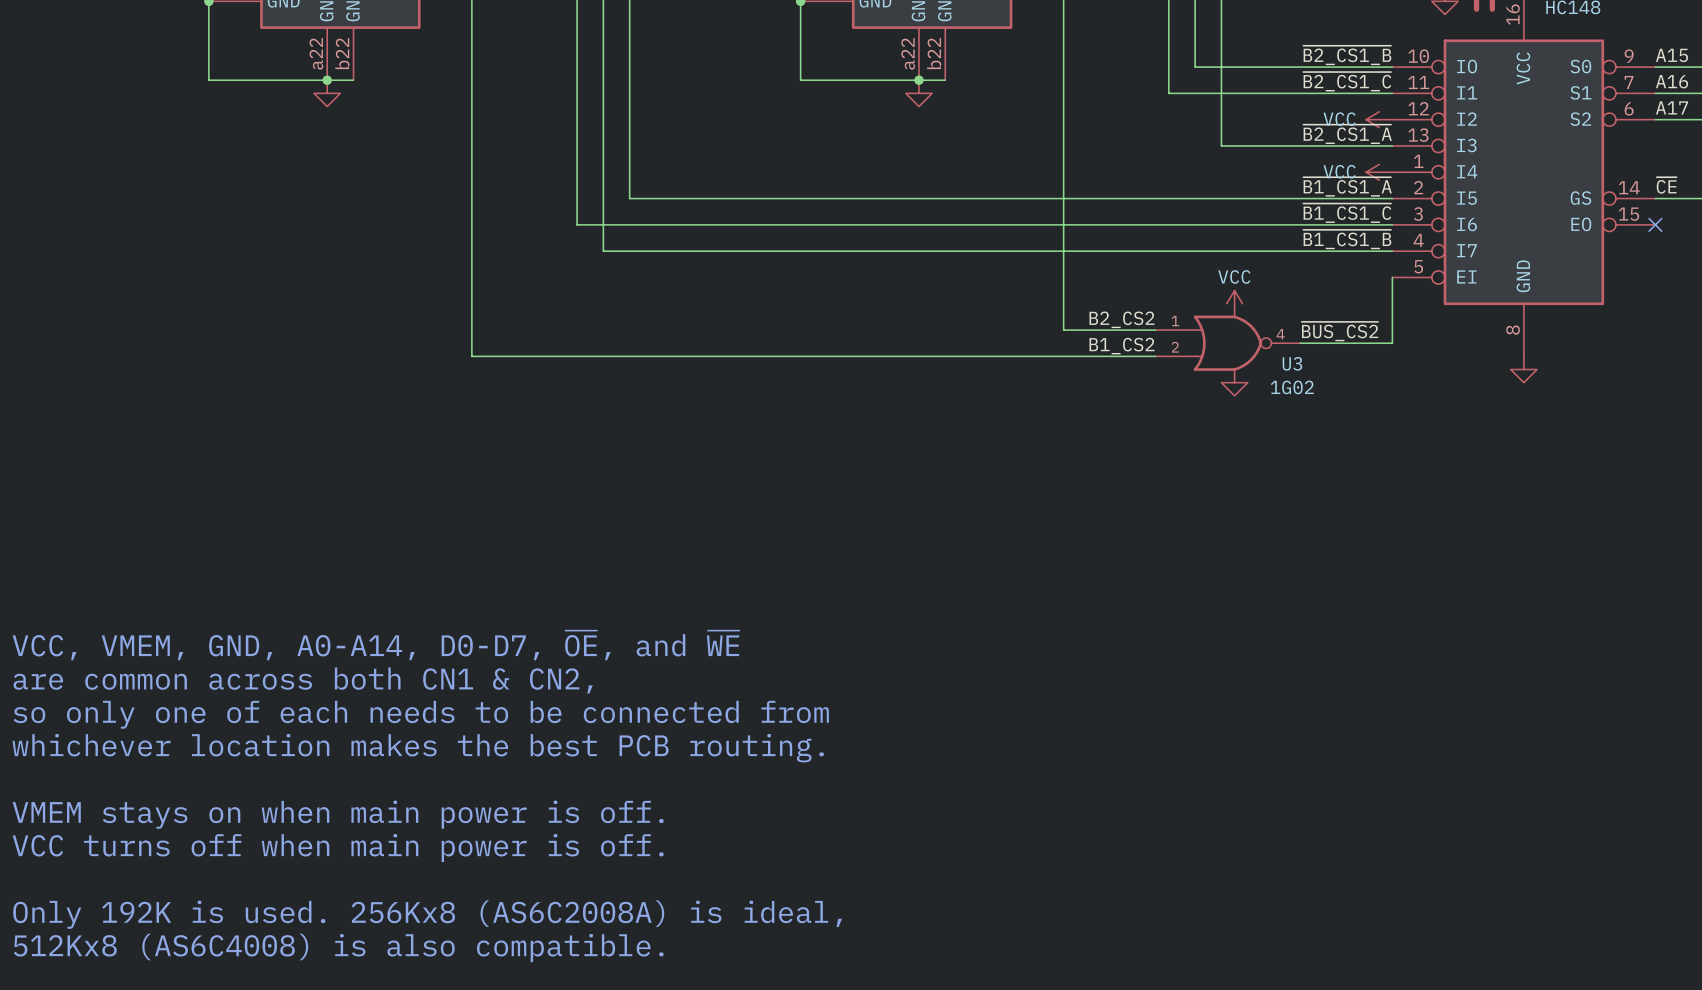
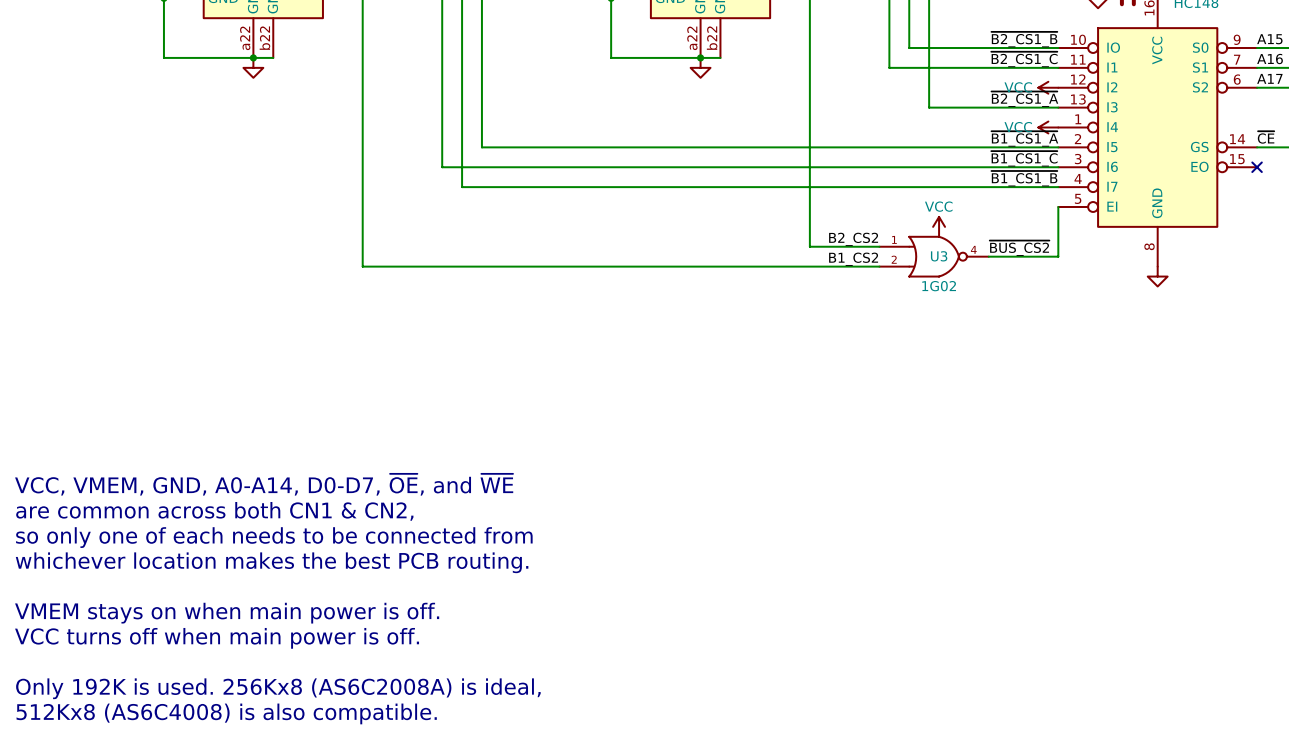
U3 name position: U3 (1292, 363) -> U3 (939, 256)
power symbol: (1234, 382) -> none
U3 value position: 1G02 (1292, 387) -> 1G02 (939, 286)

